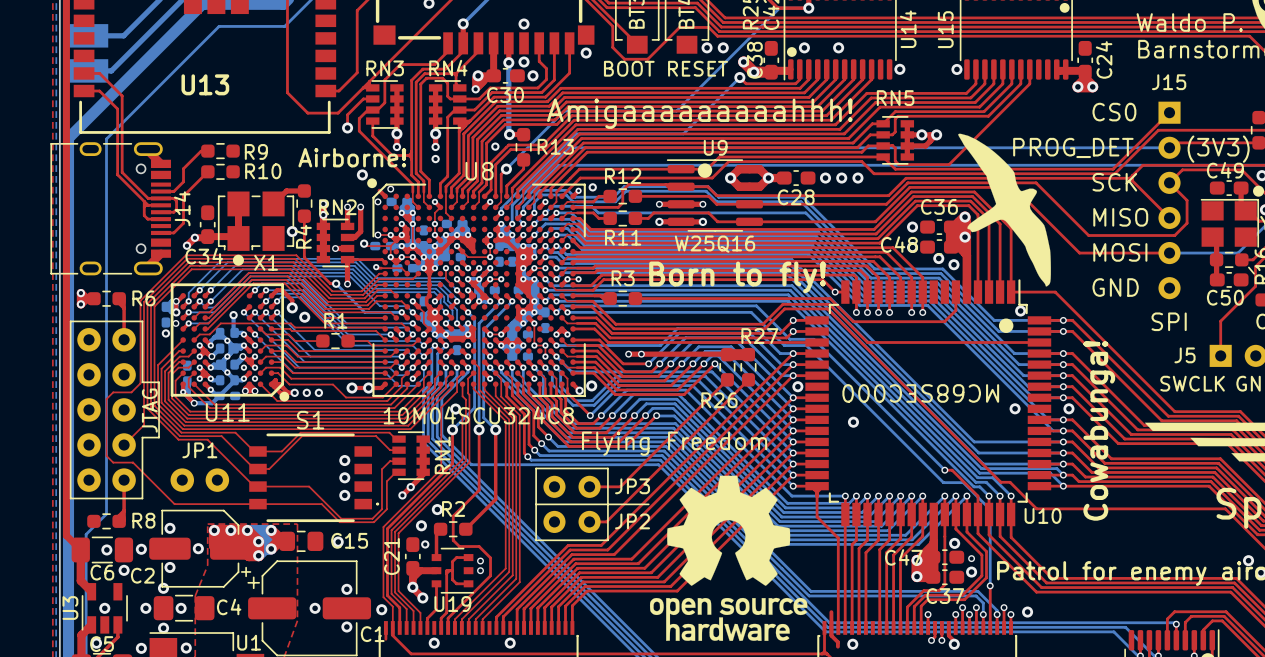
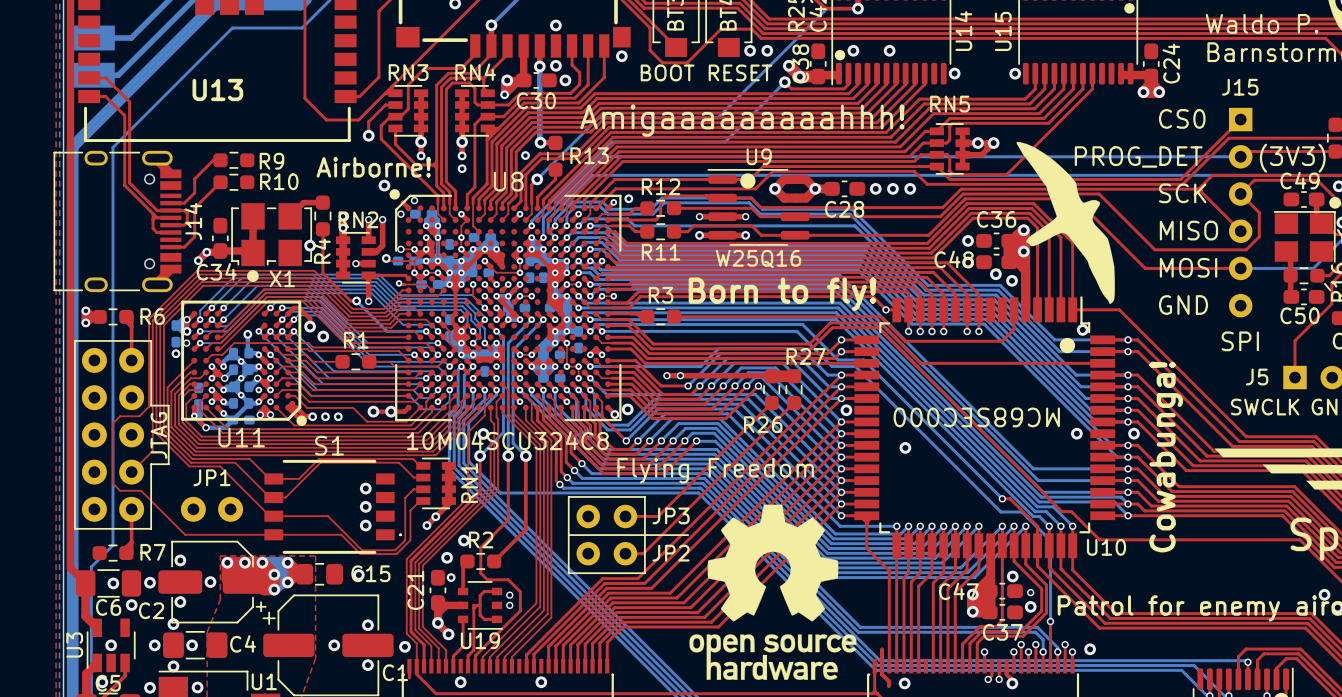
R8 name: R8 (143, 520) -> R7 (153, 552)

